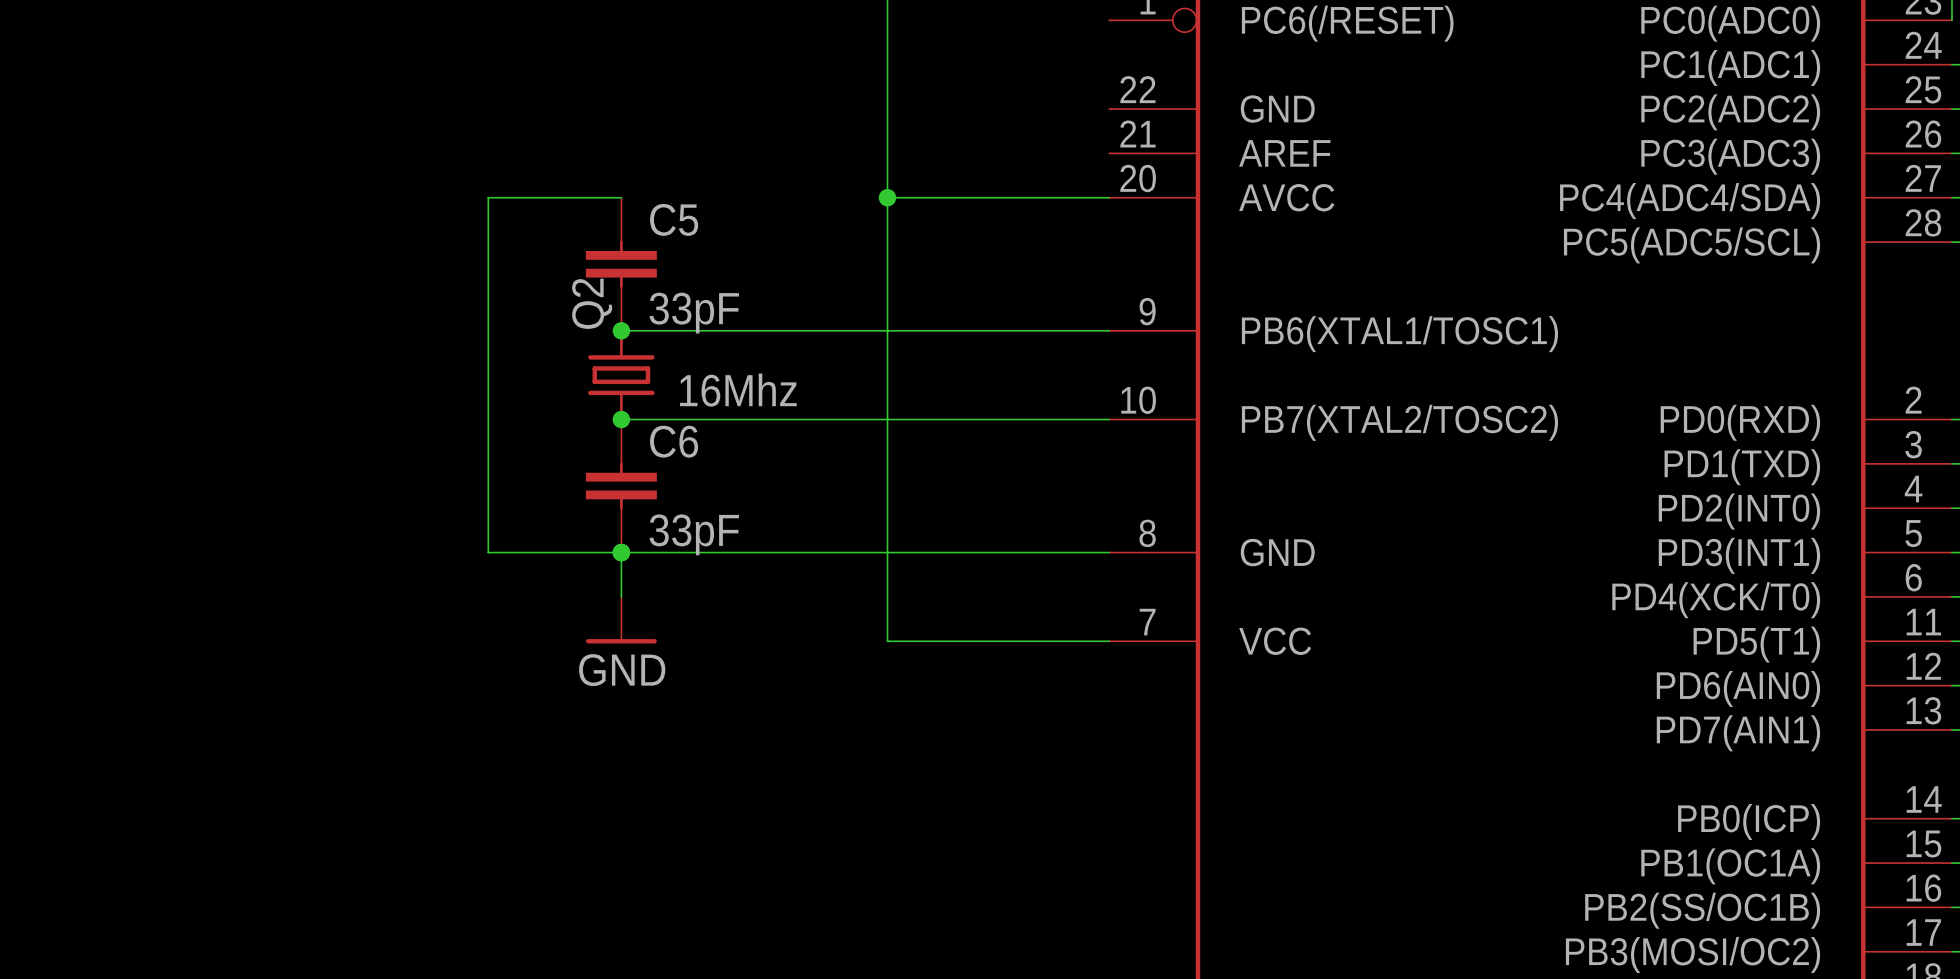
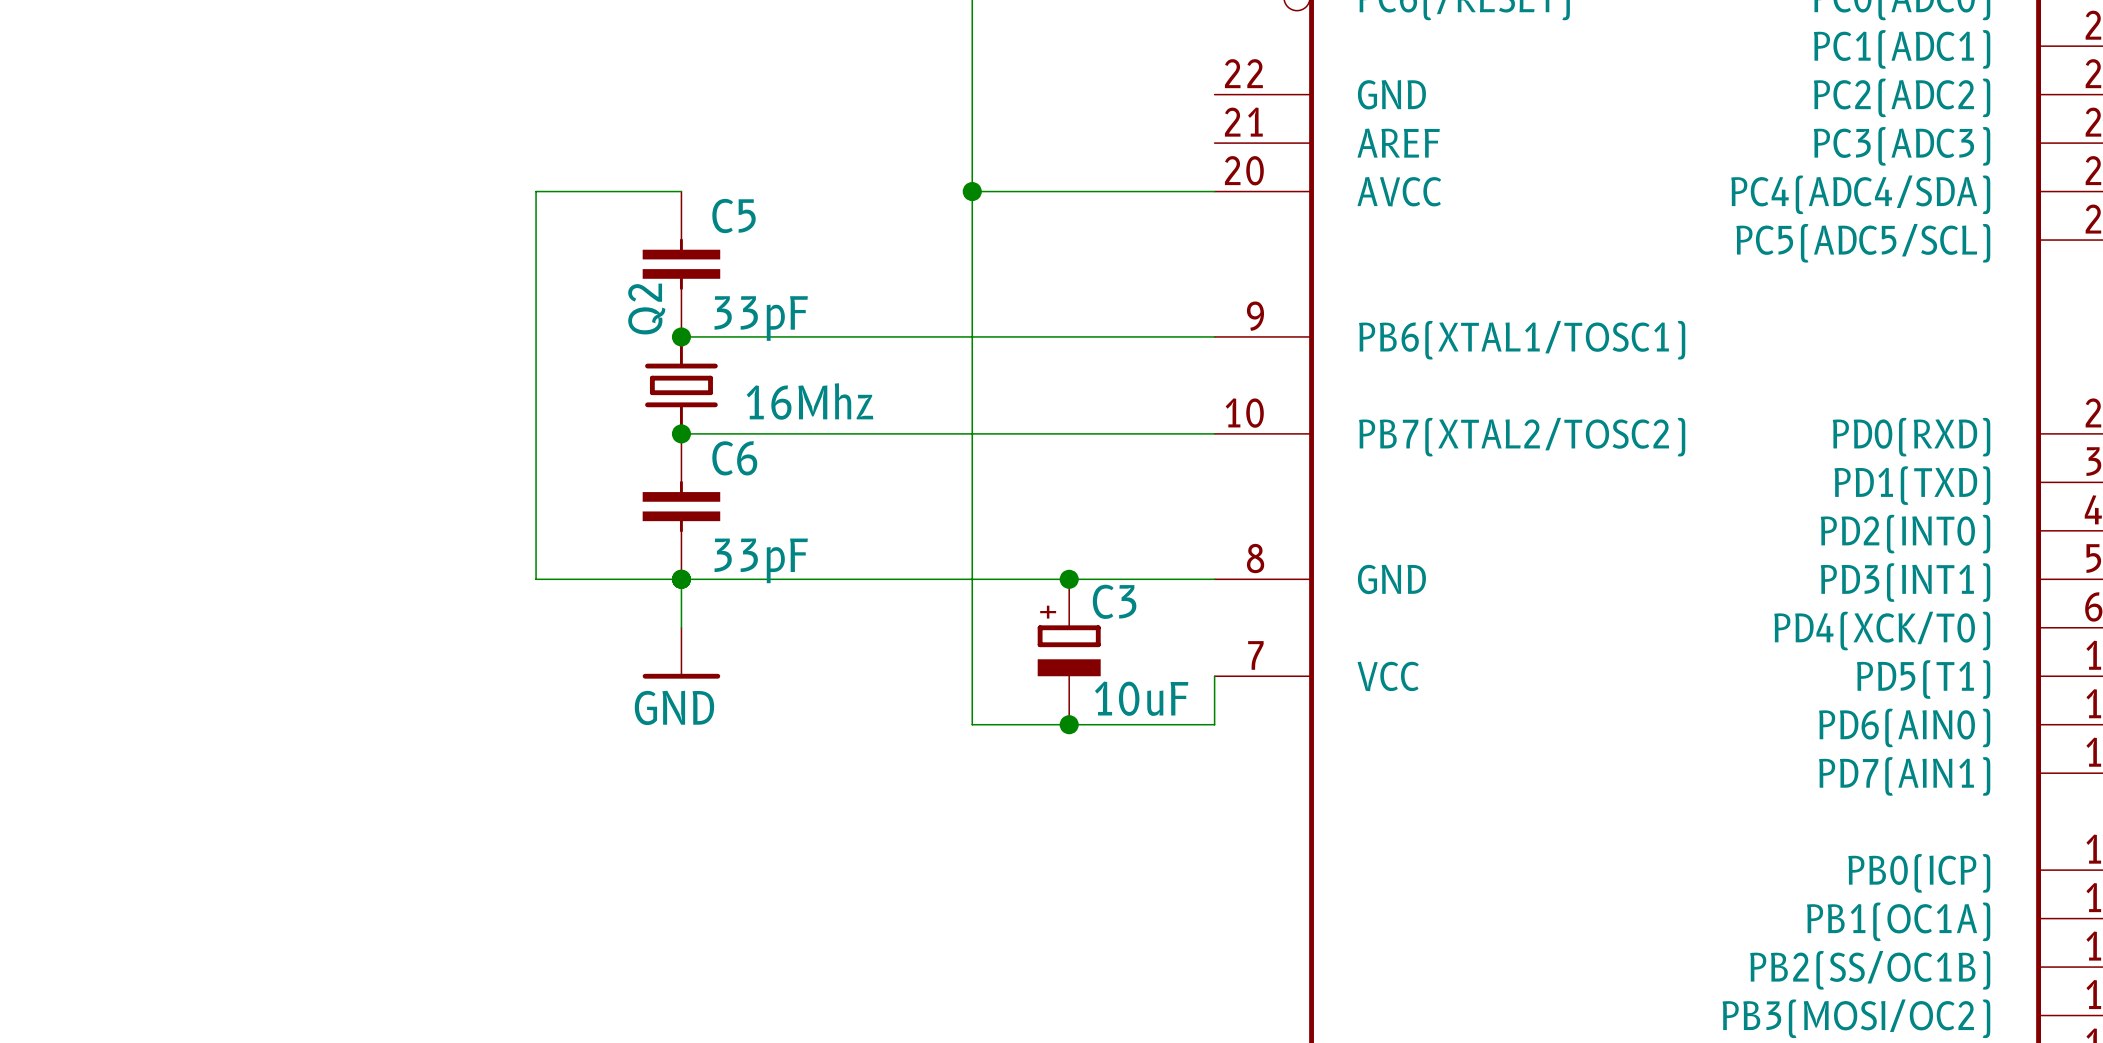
junction: none -> (1069, 579)
C3: none -> 10uF (1069, 652)
wire: (887, 641) (1109, 641) -> (972, 676) (972, 724) (1214, 724) (1214, 676)
junction: none -> (1069, 724)

